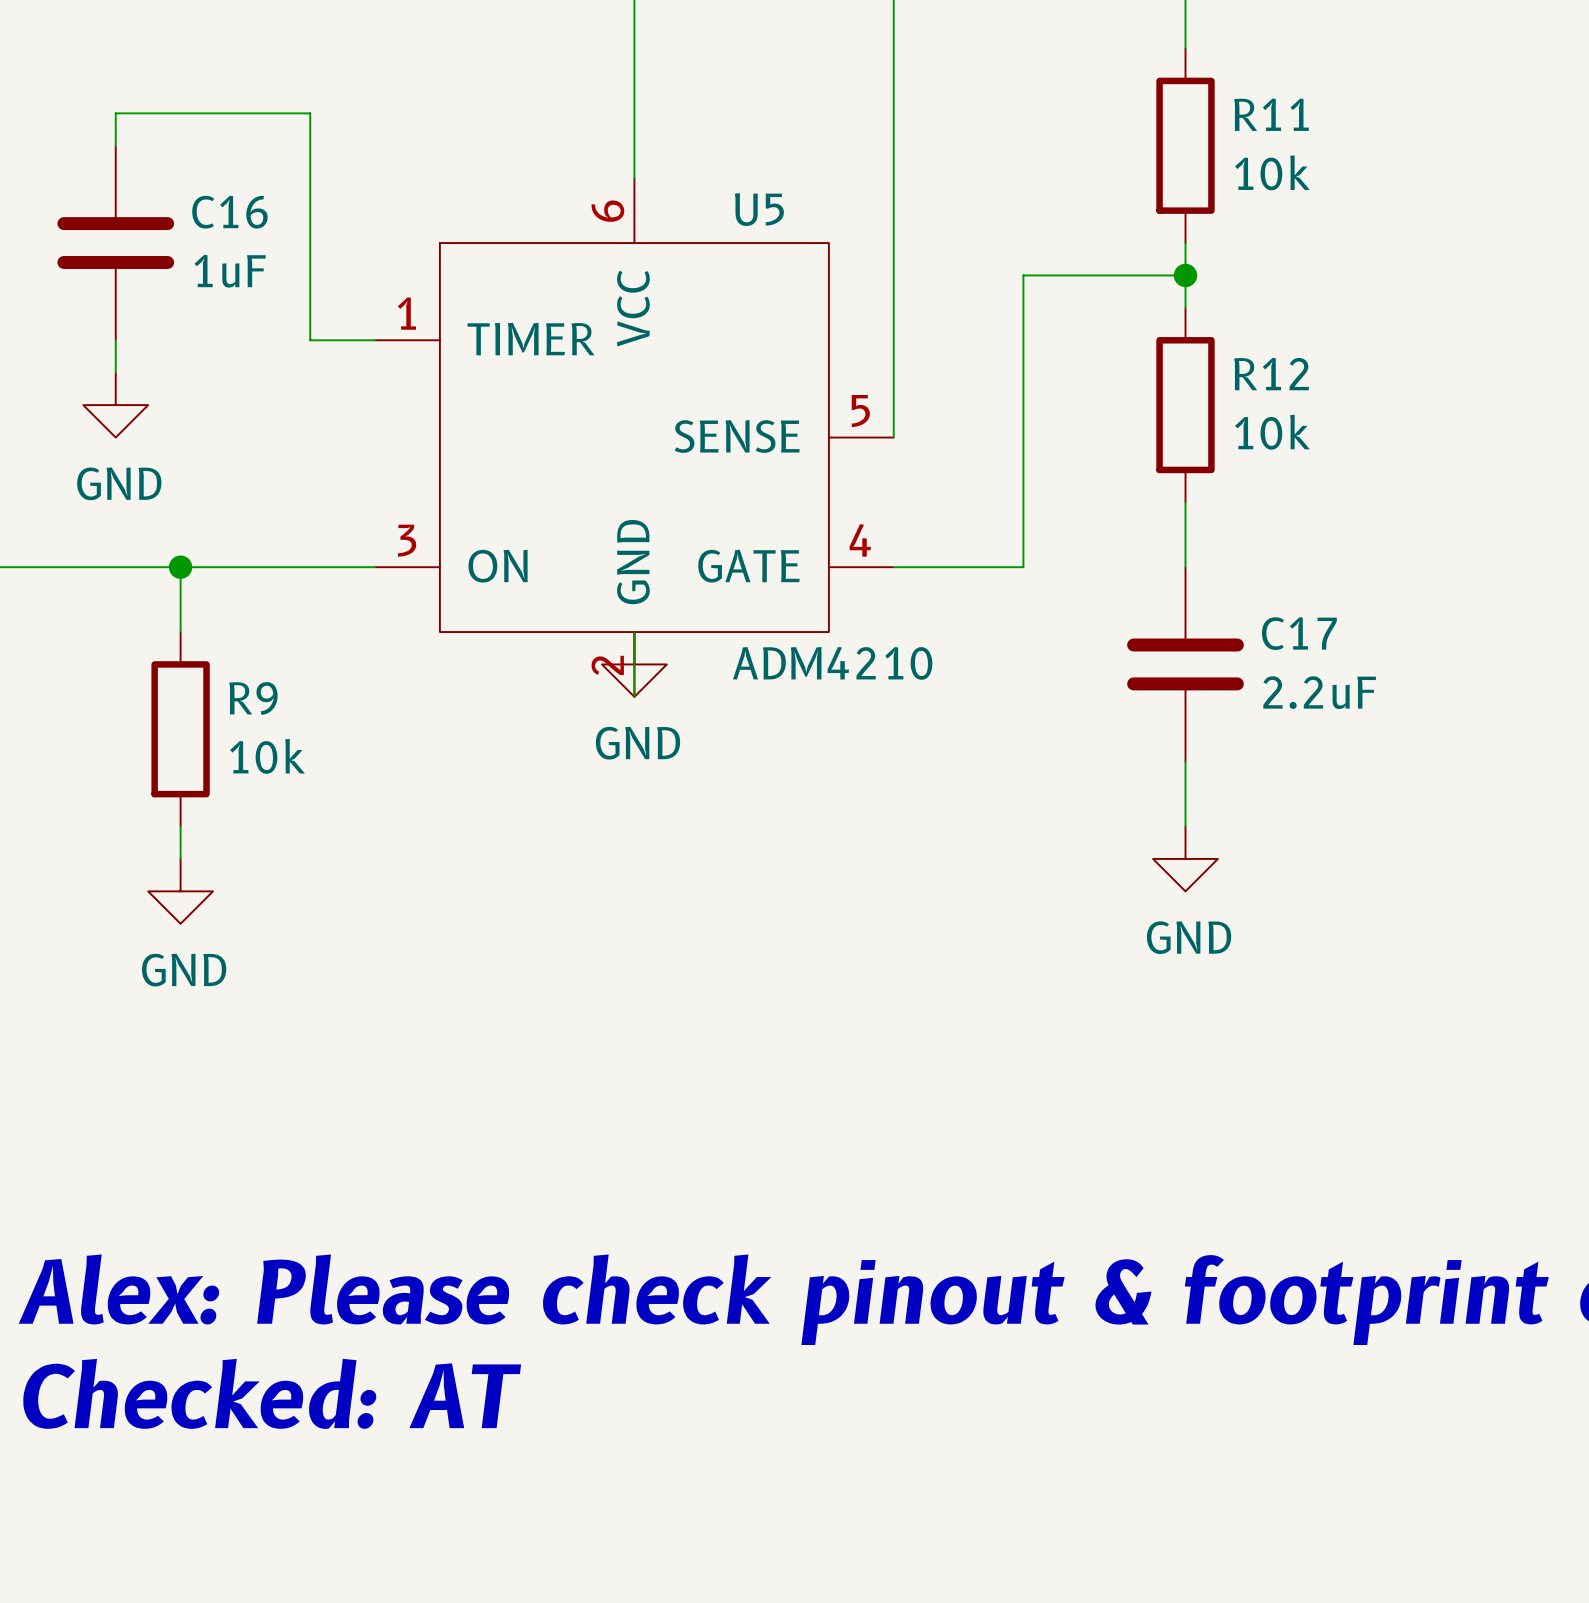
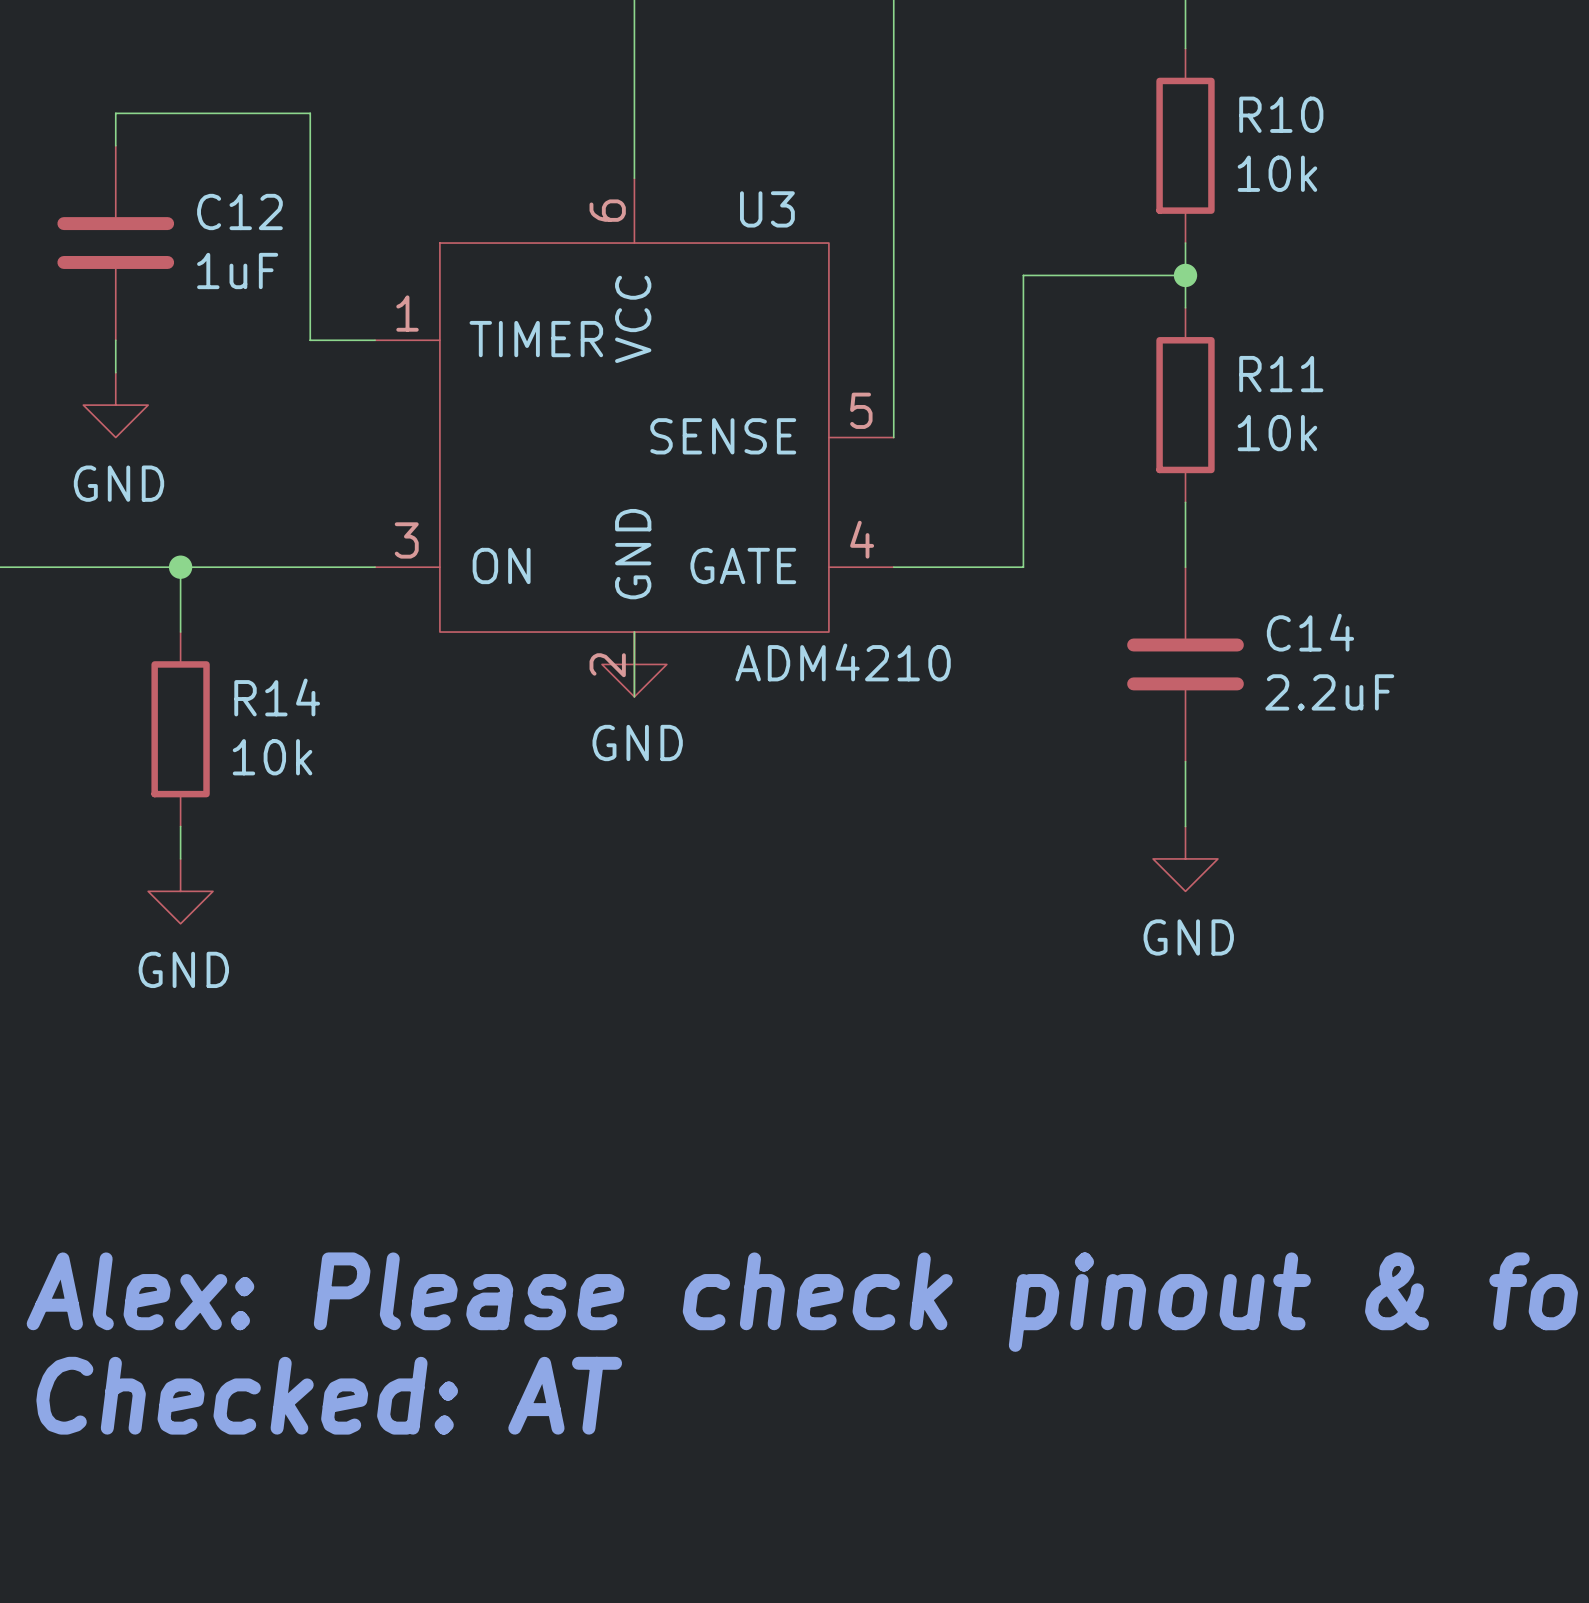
R11 name: R11 (1271, 114) -> R10 (1281, 114)
U5 name: U5 (759, 209) -> U3 (767, 209)
C16 name: C16 (229, 212) -> C12 (239, 211)
R12 name: R12 (1271, 374) -> R11 (1281, 374)
C17 name: C17 (1299, 633) -> C14 (1310, 632)
R9 name: R9 (253, 698) -> R14 (277, 697)

